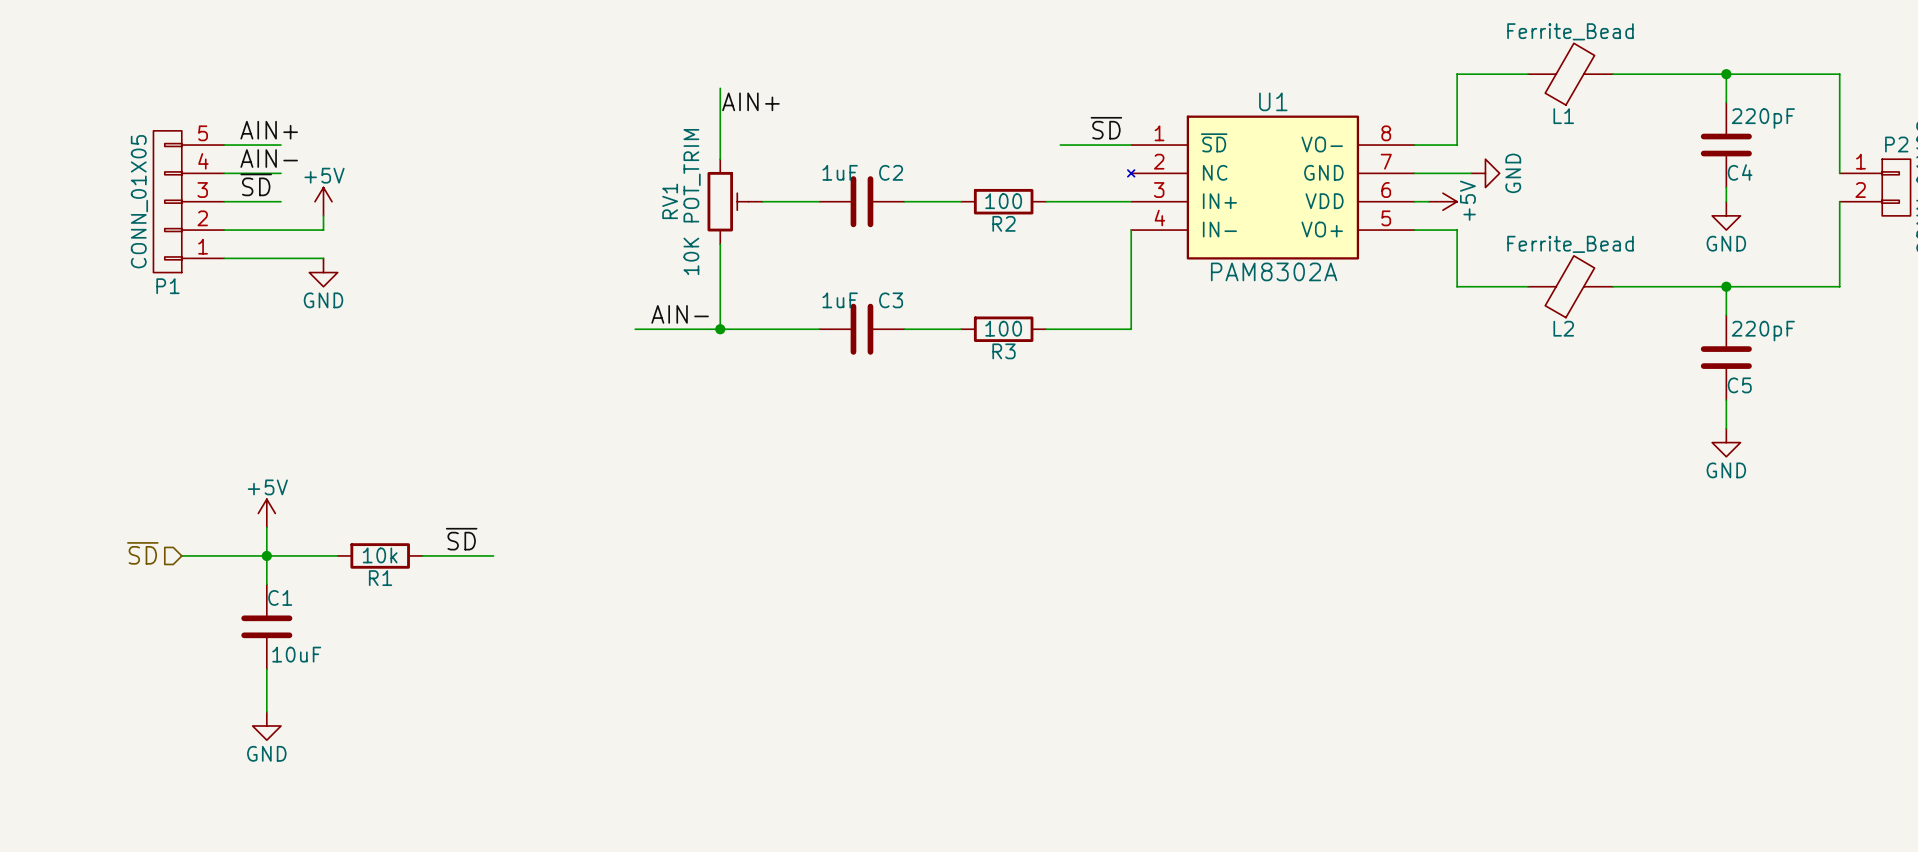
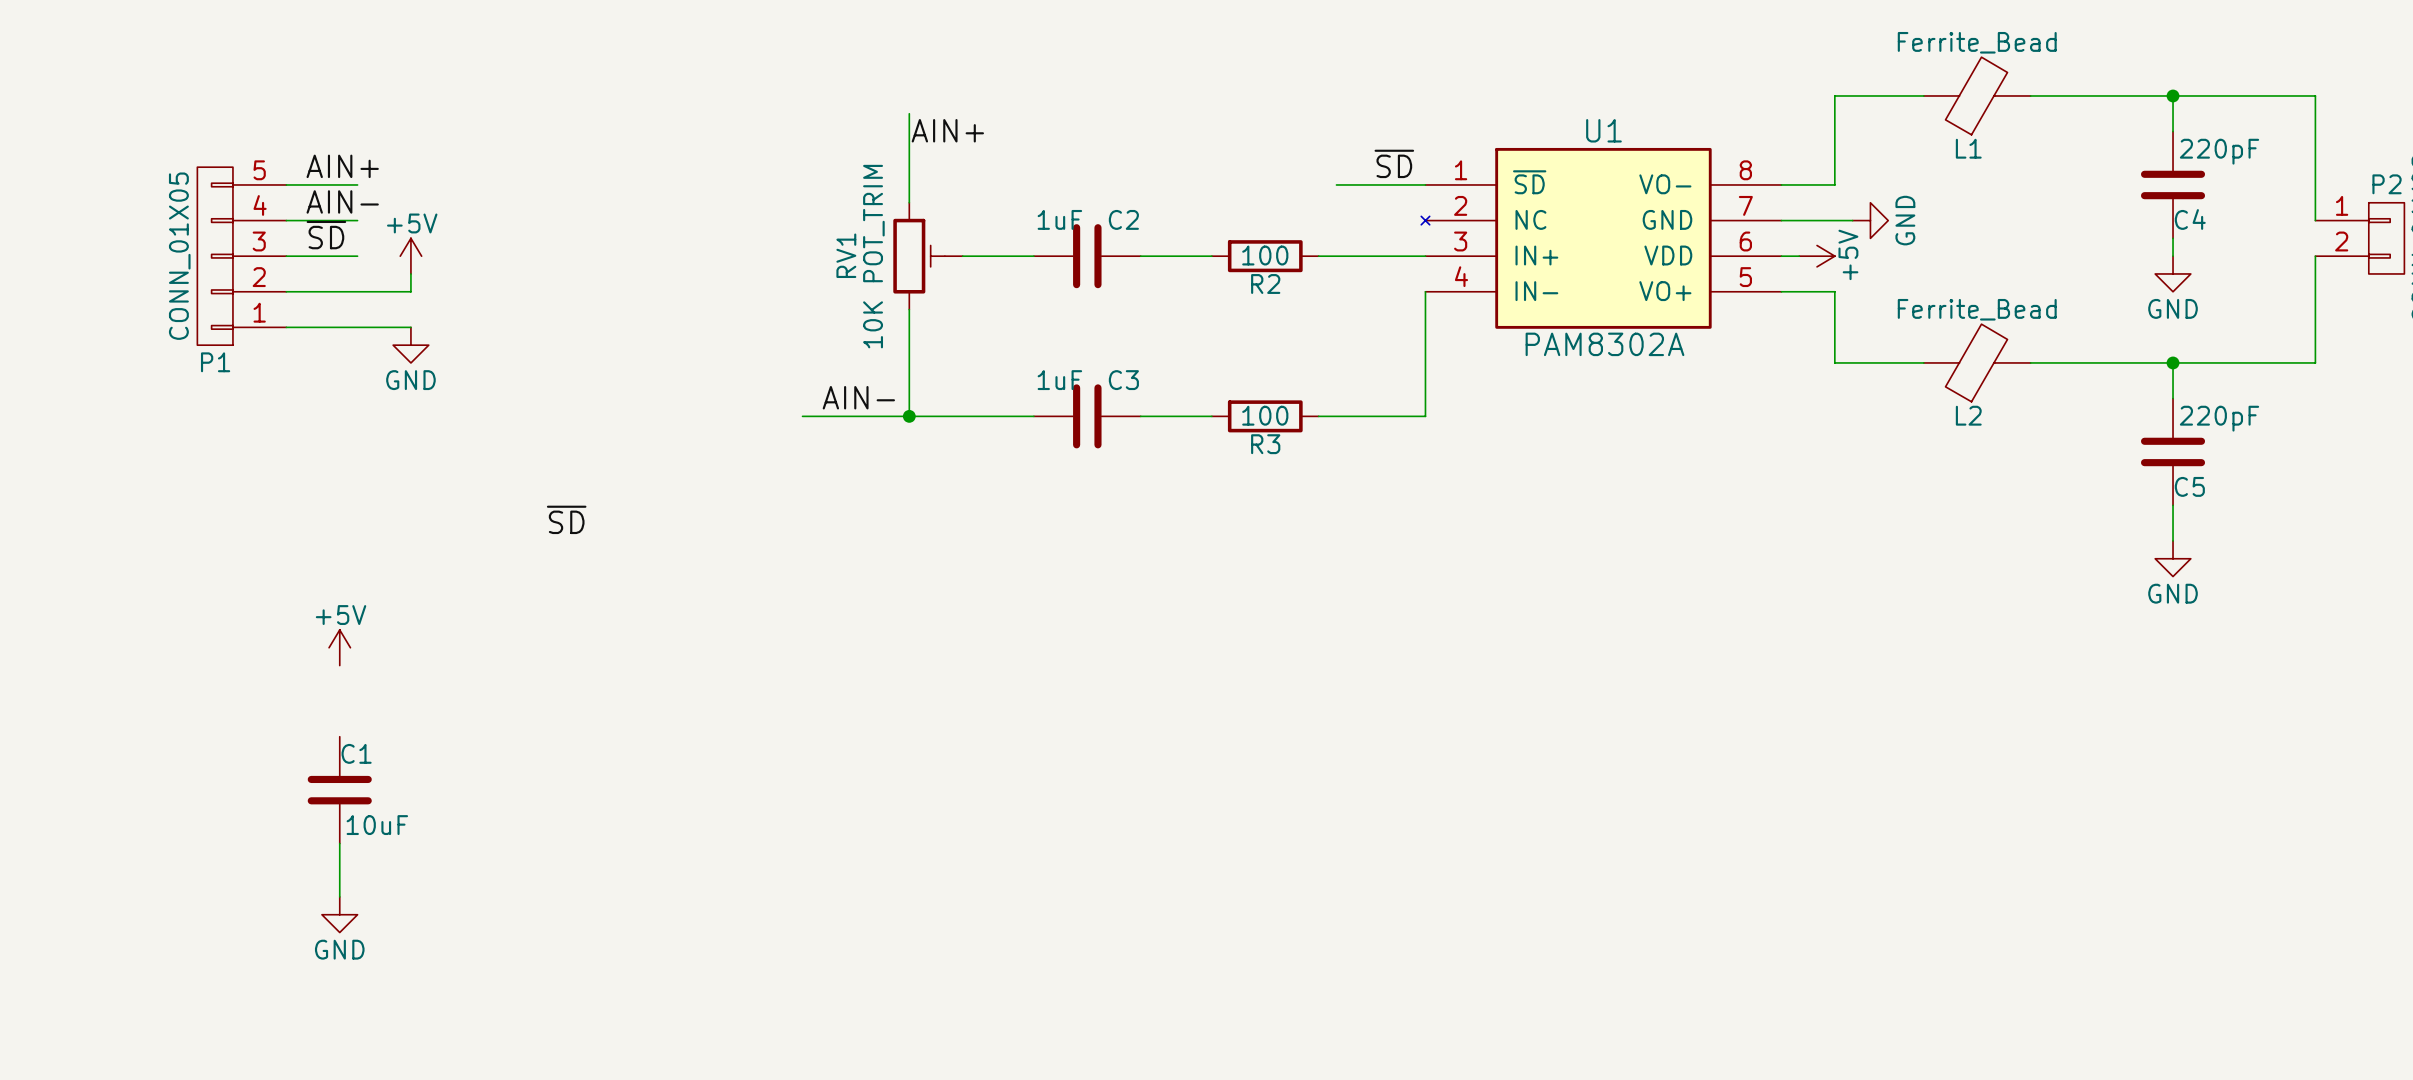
wire: (266, 527) (266, 584) -> none
label position: ~{SD} (461, 539) -> ~{SD} (566, 519)
hierarchical label: ~{SD} (142, 553) -> none
wire: (181, 555) (337, 555) -> none
junction: (266, 555) -> none
R1: 10k (380, 555) -> none
wire: (422, 555) (493, 555) -> none

